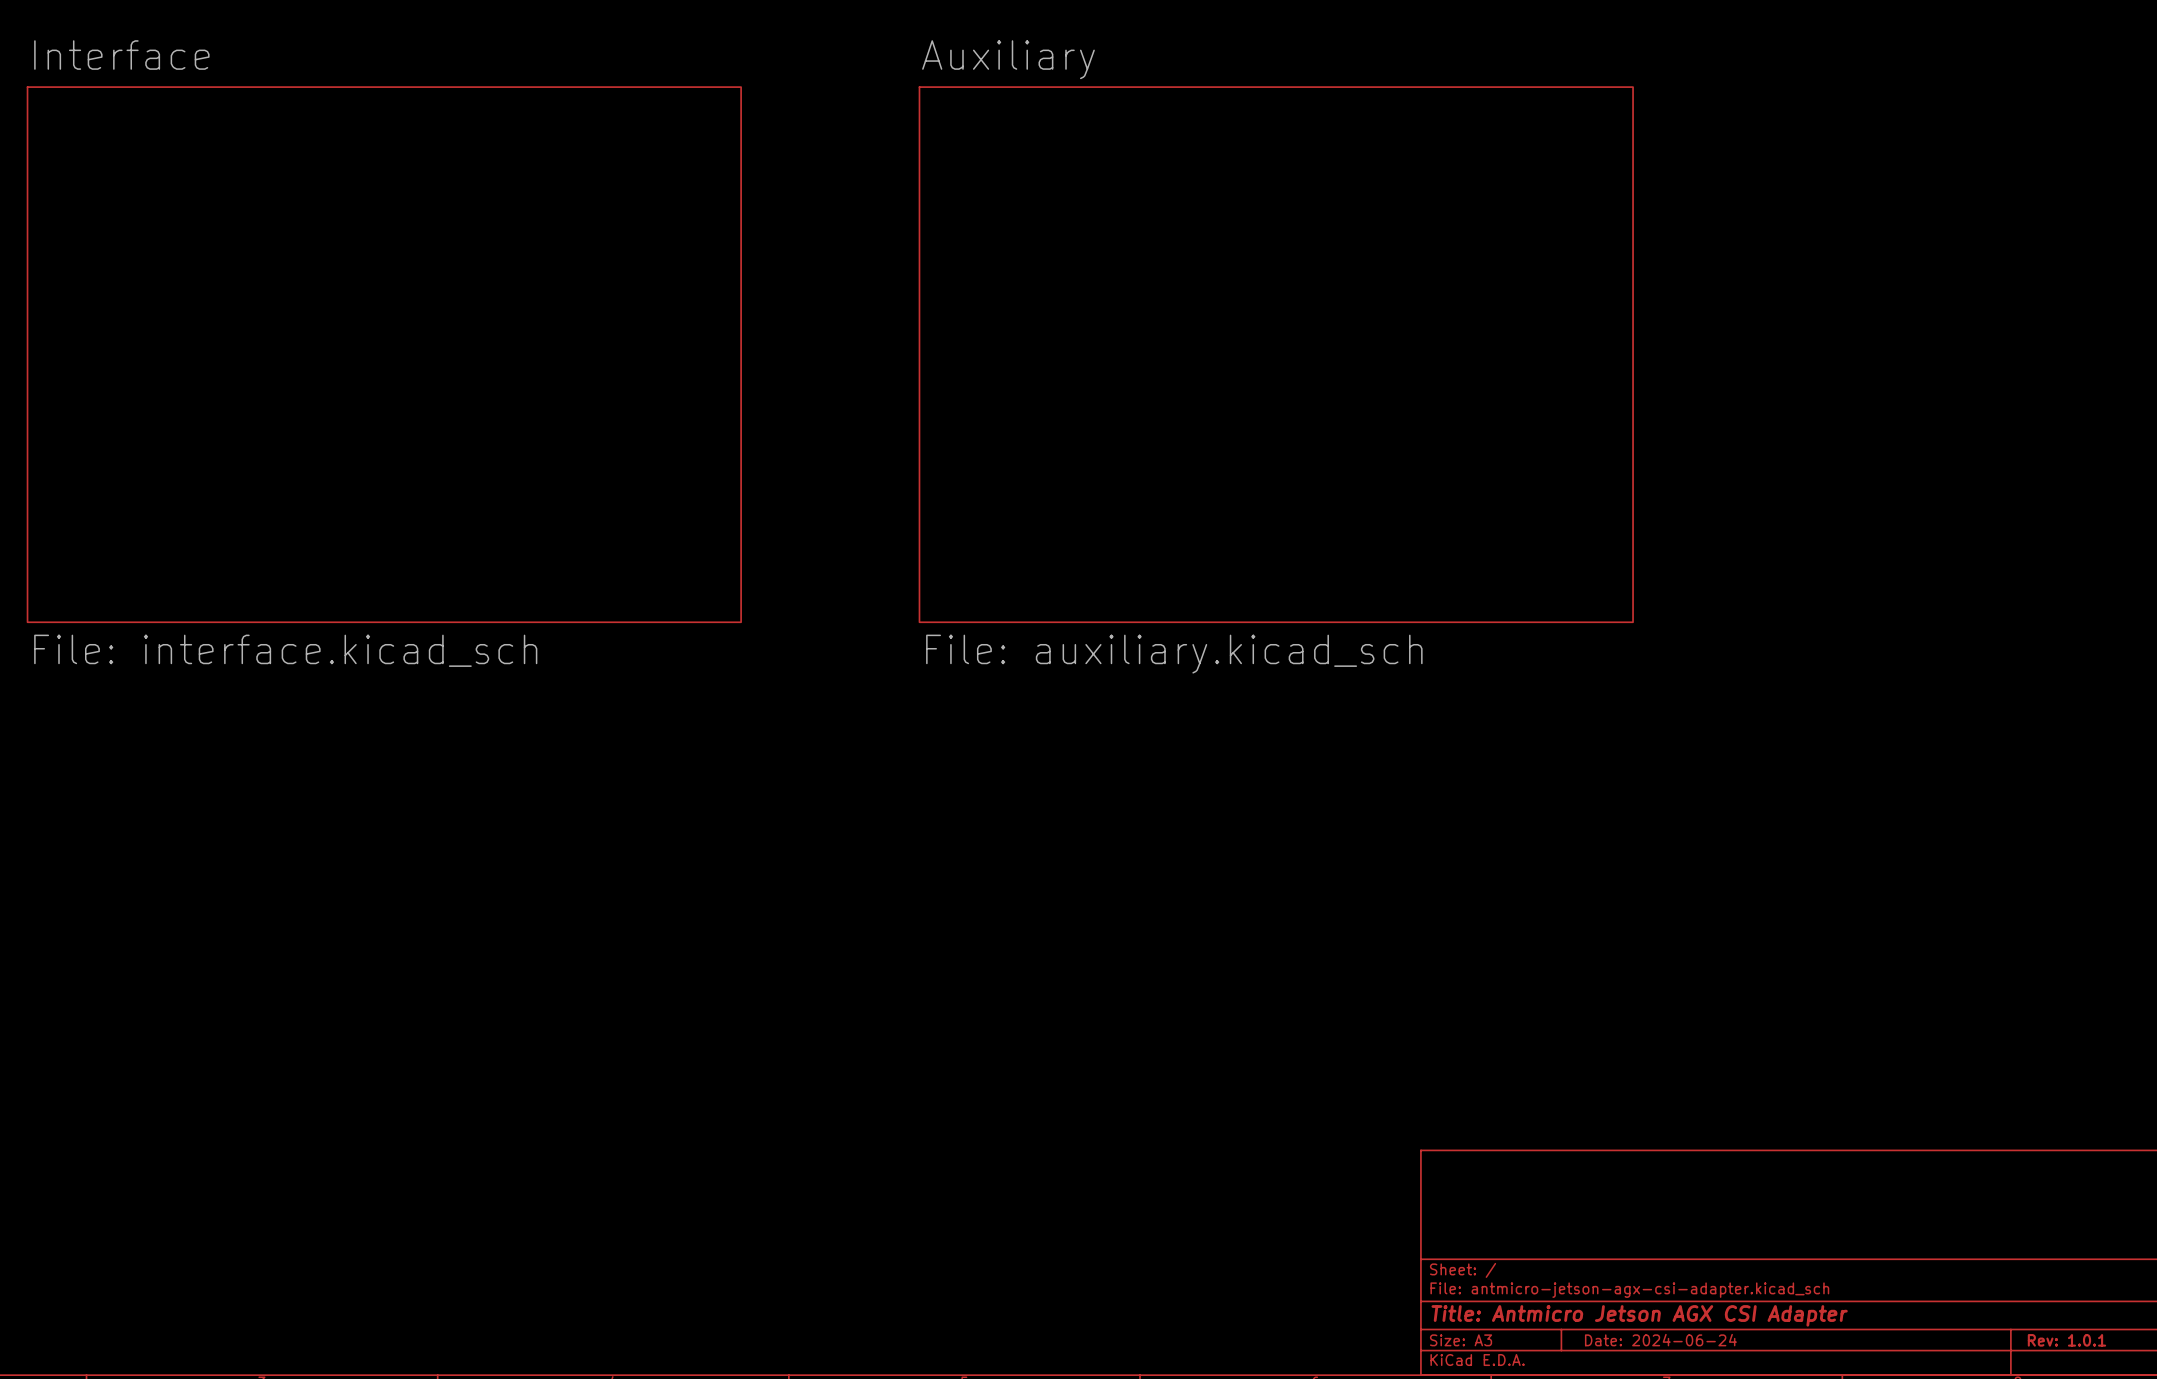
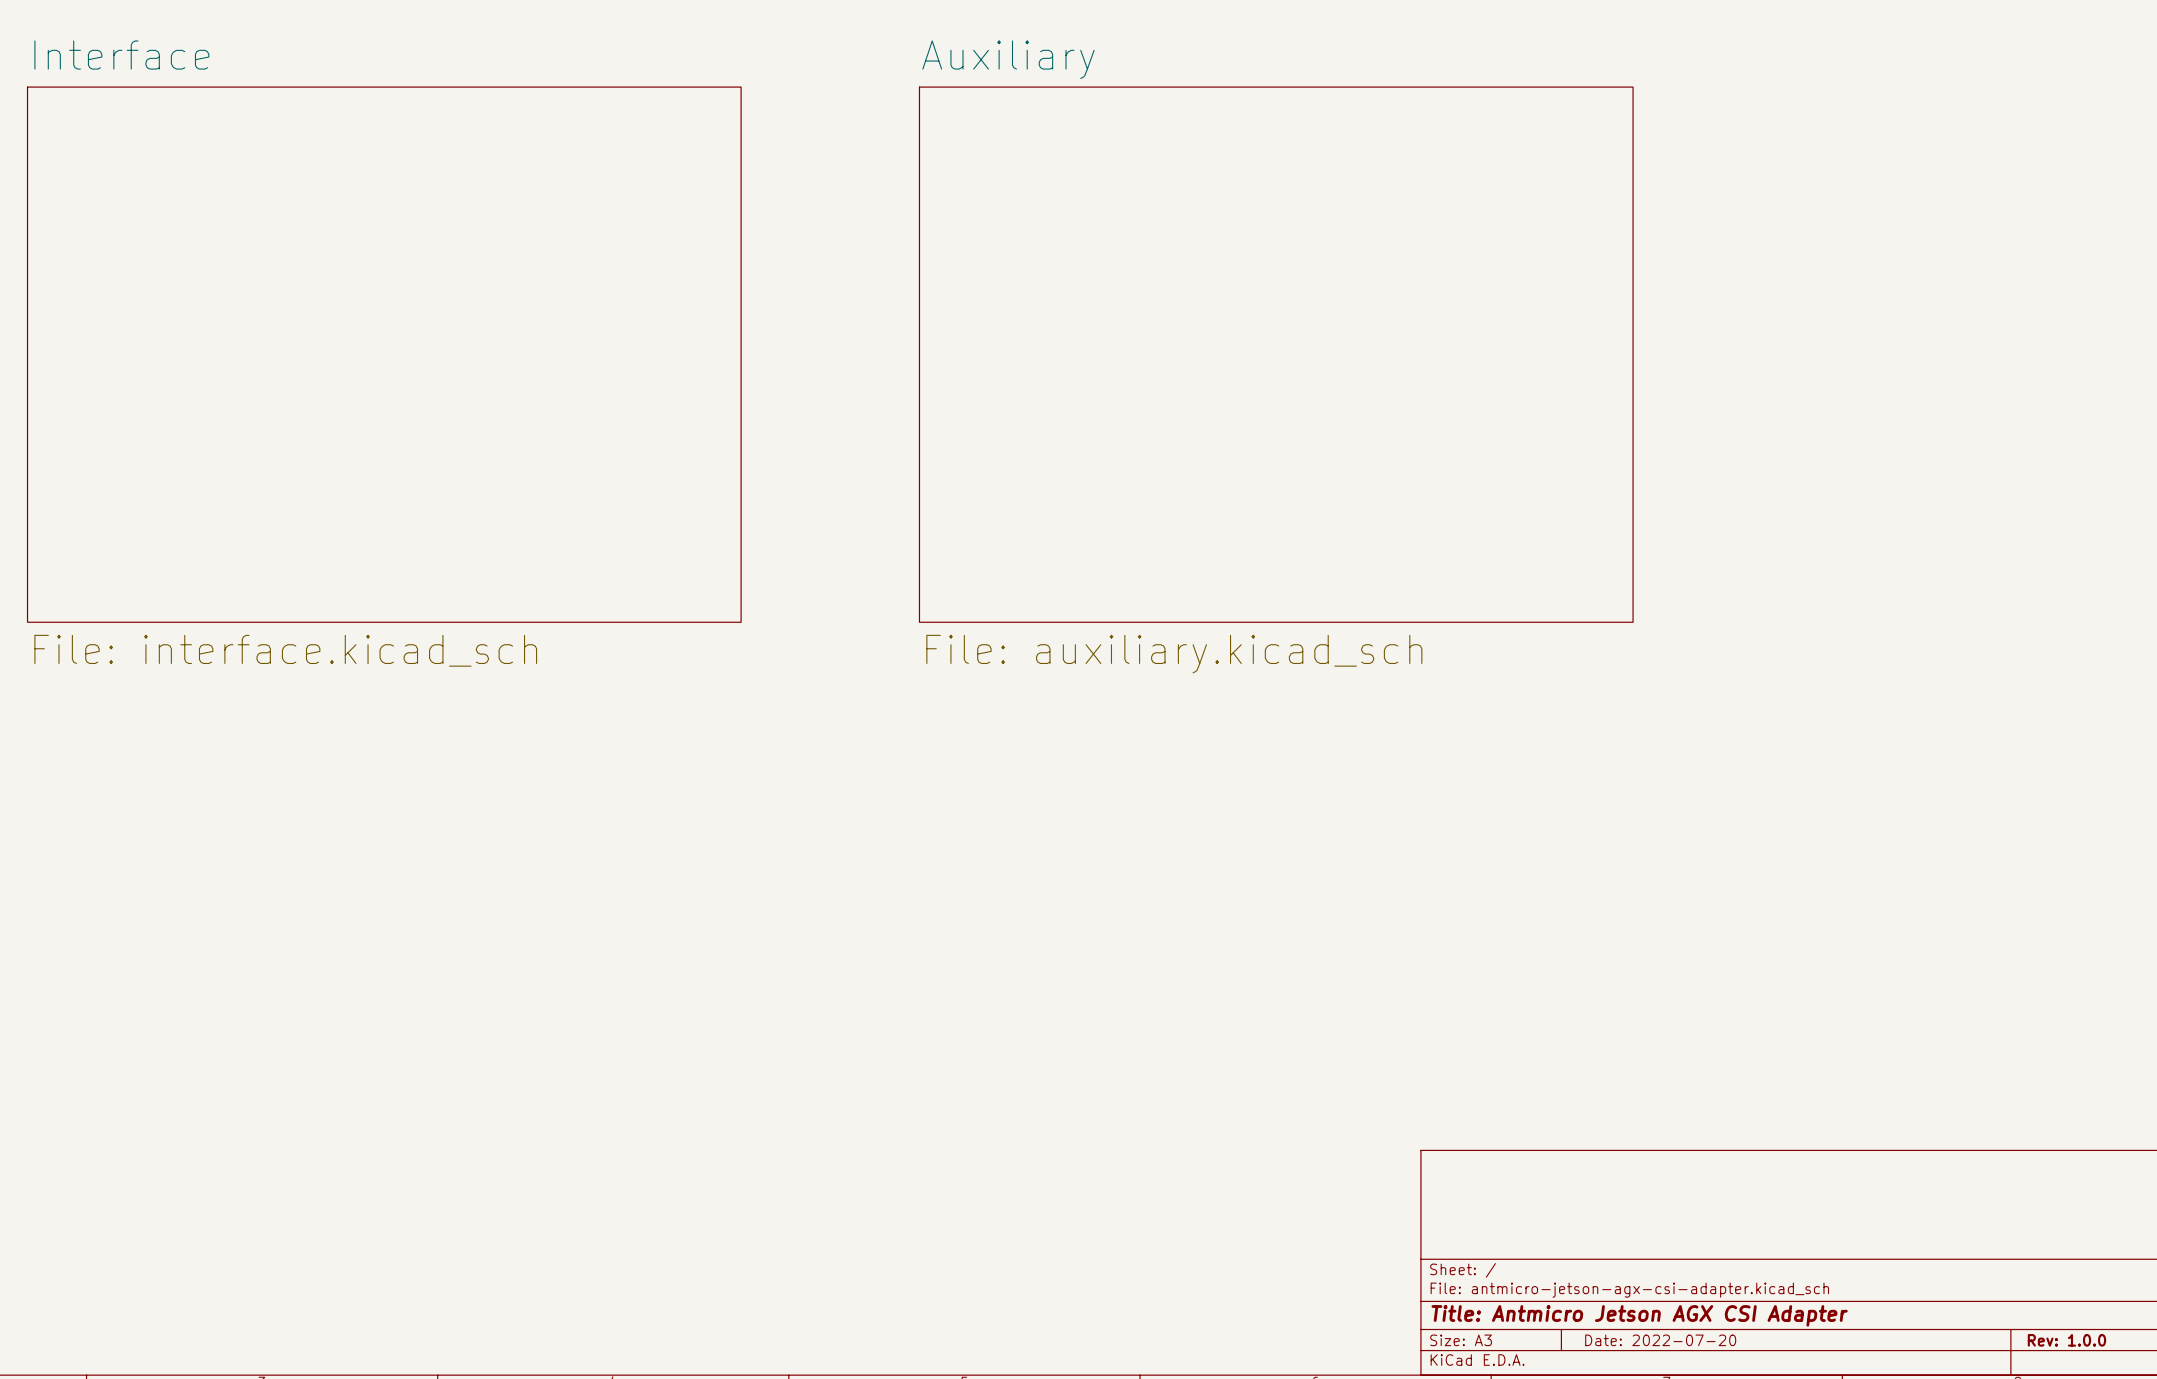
title block: Date: 2024-06-24 (1660, 1340) -> Date: 2022-07-20 (1660, 1340)
title block: Rev: 1.0.1 (2066, 1340) -> Rev: 1.0.0 (2066, 1340)

